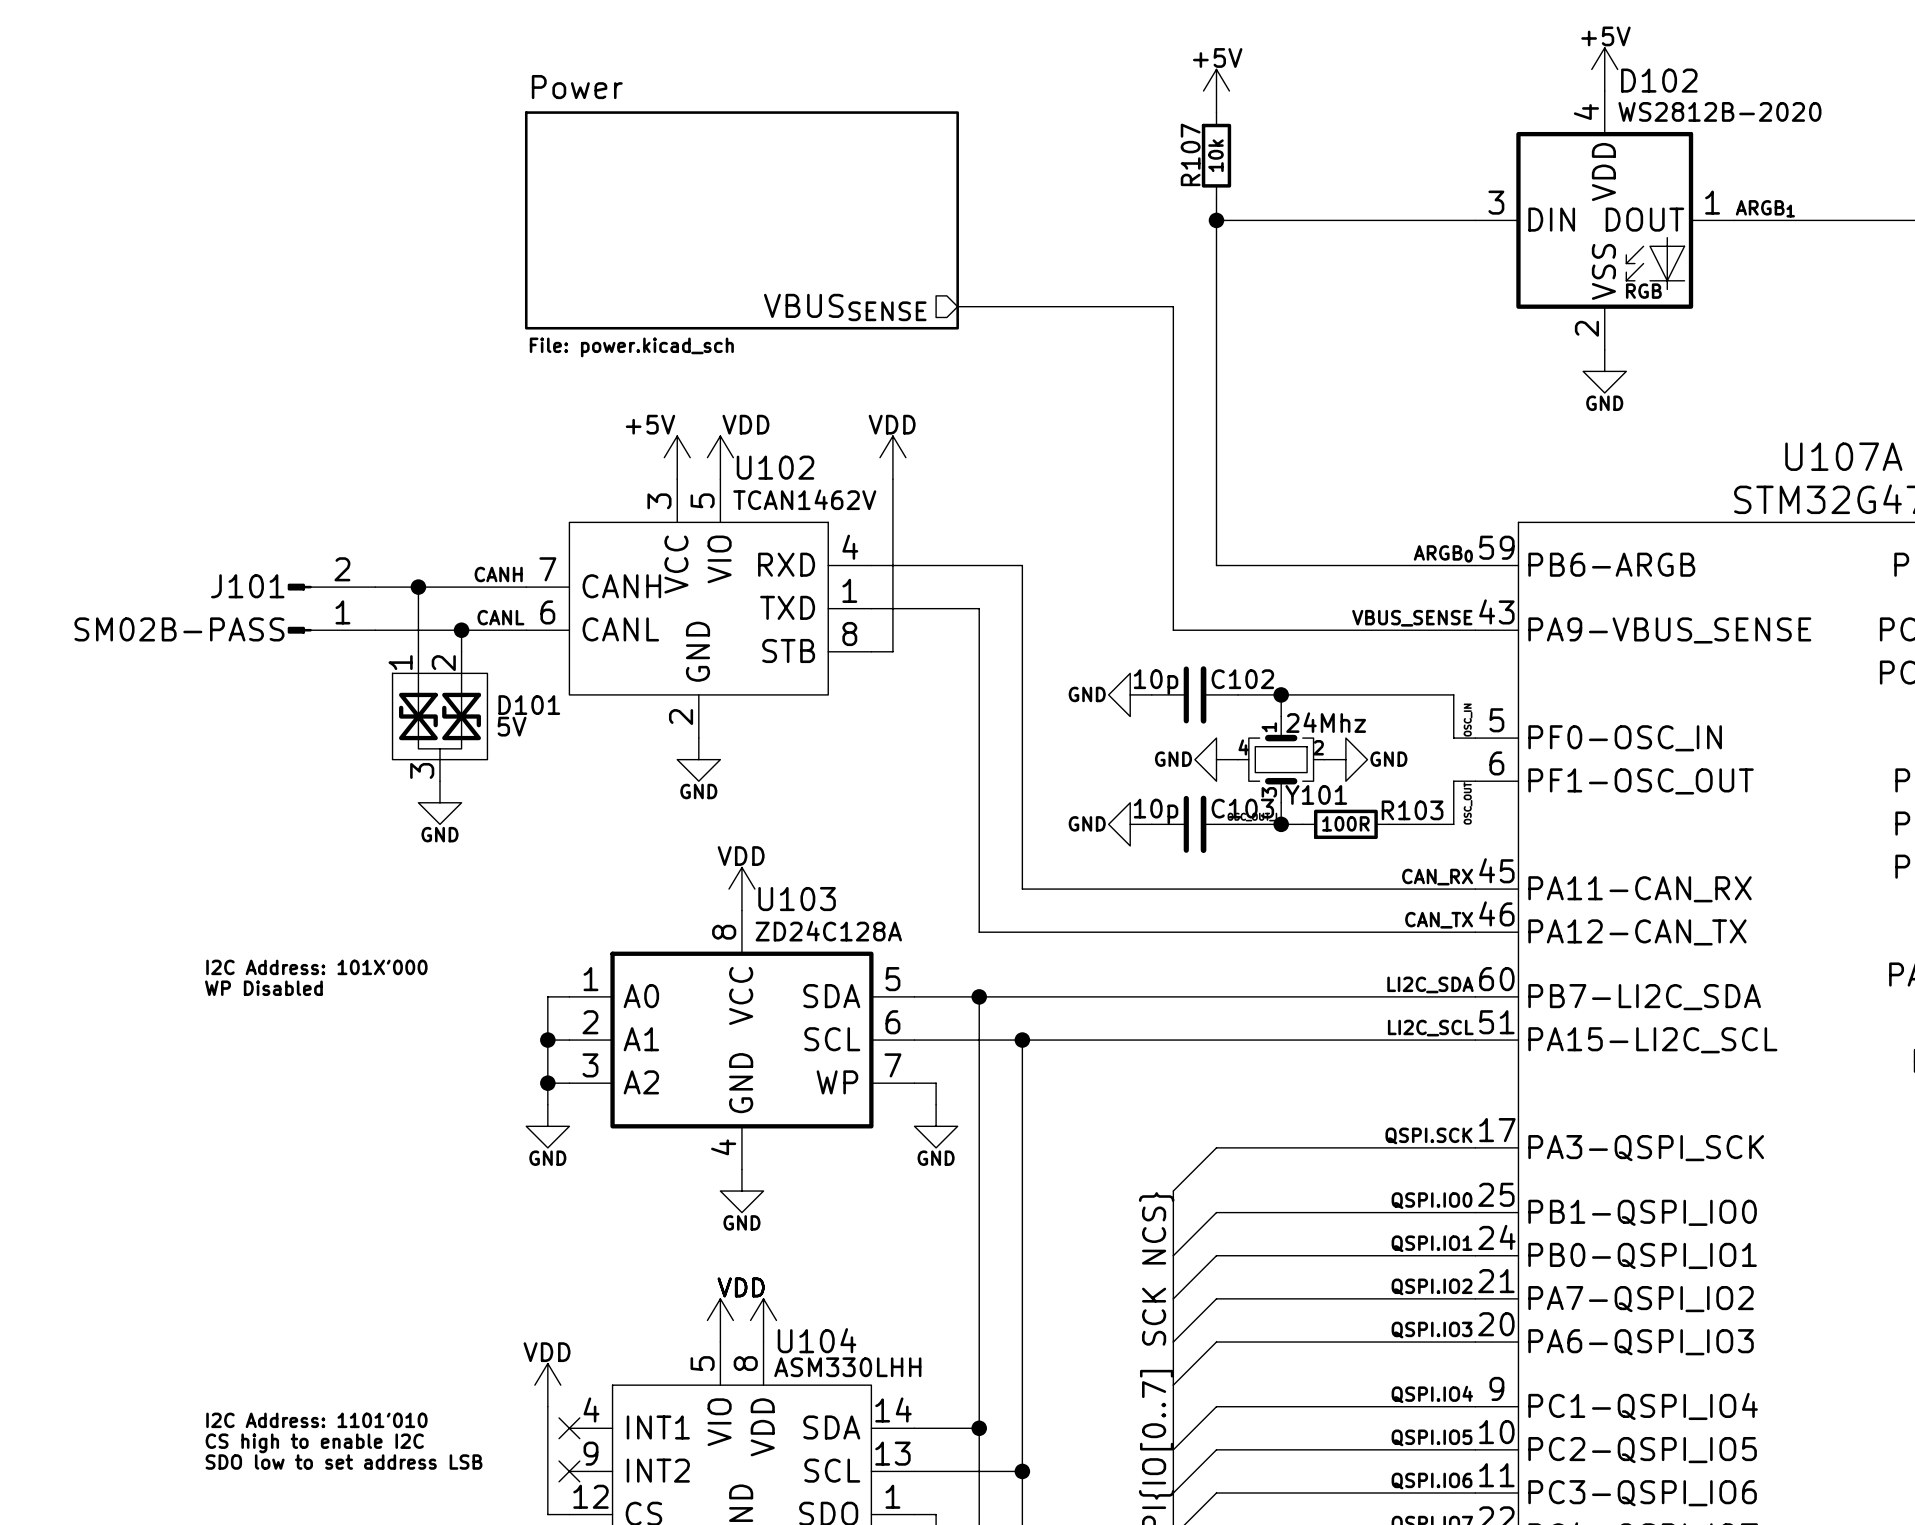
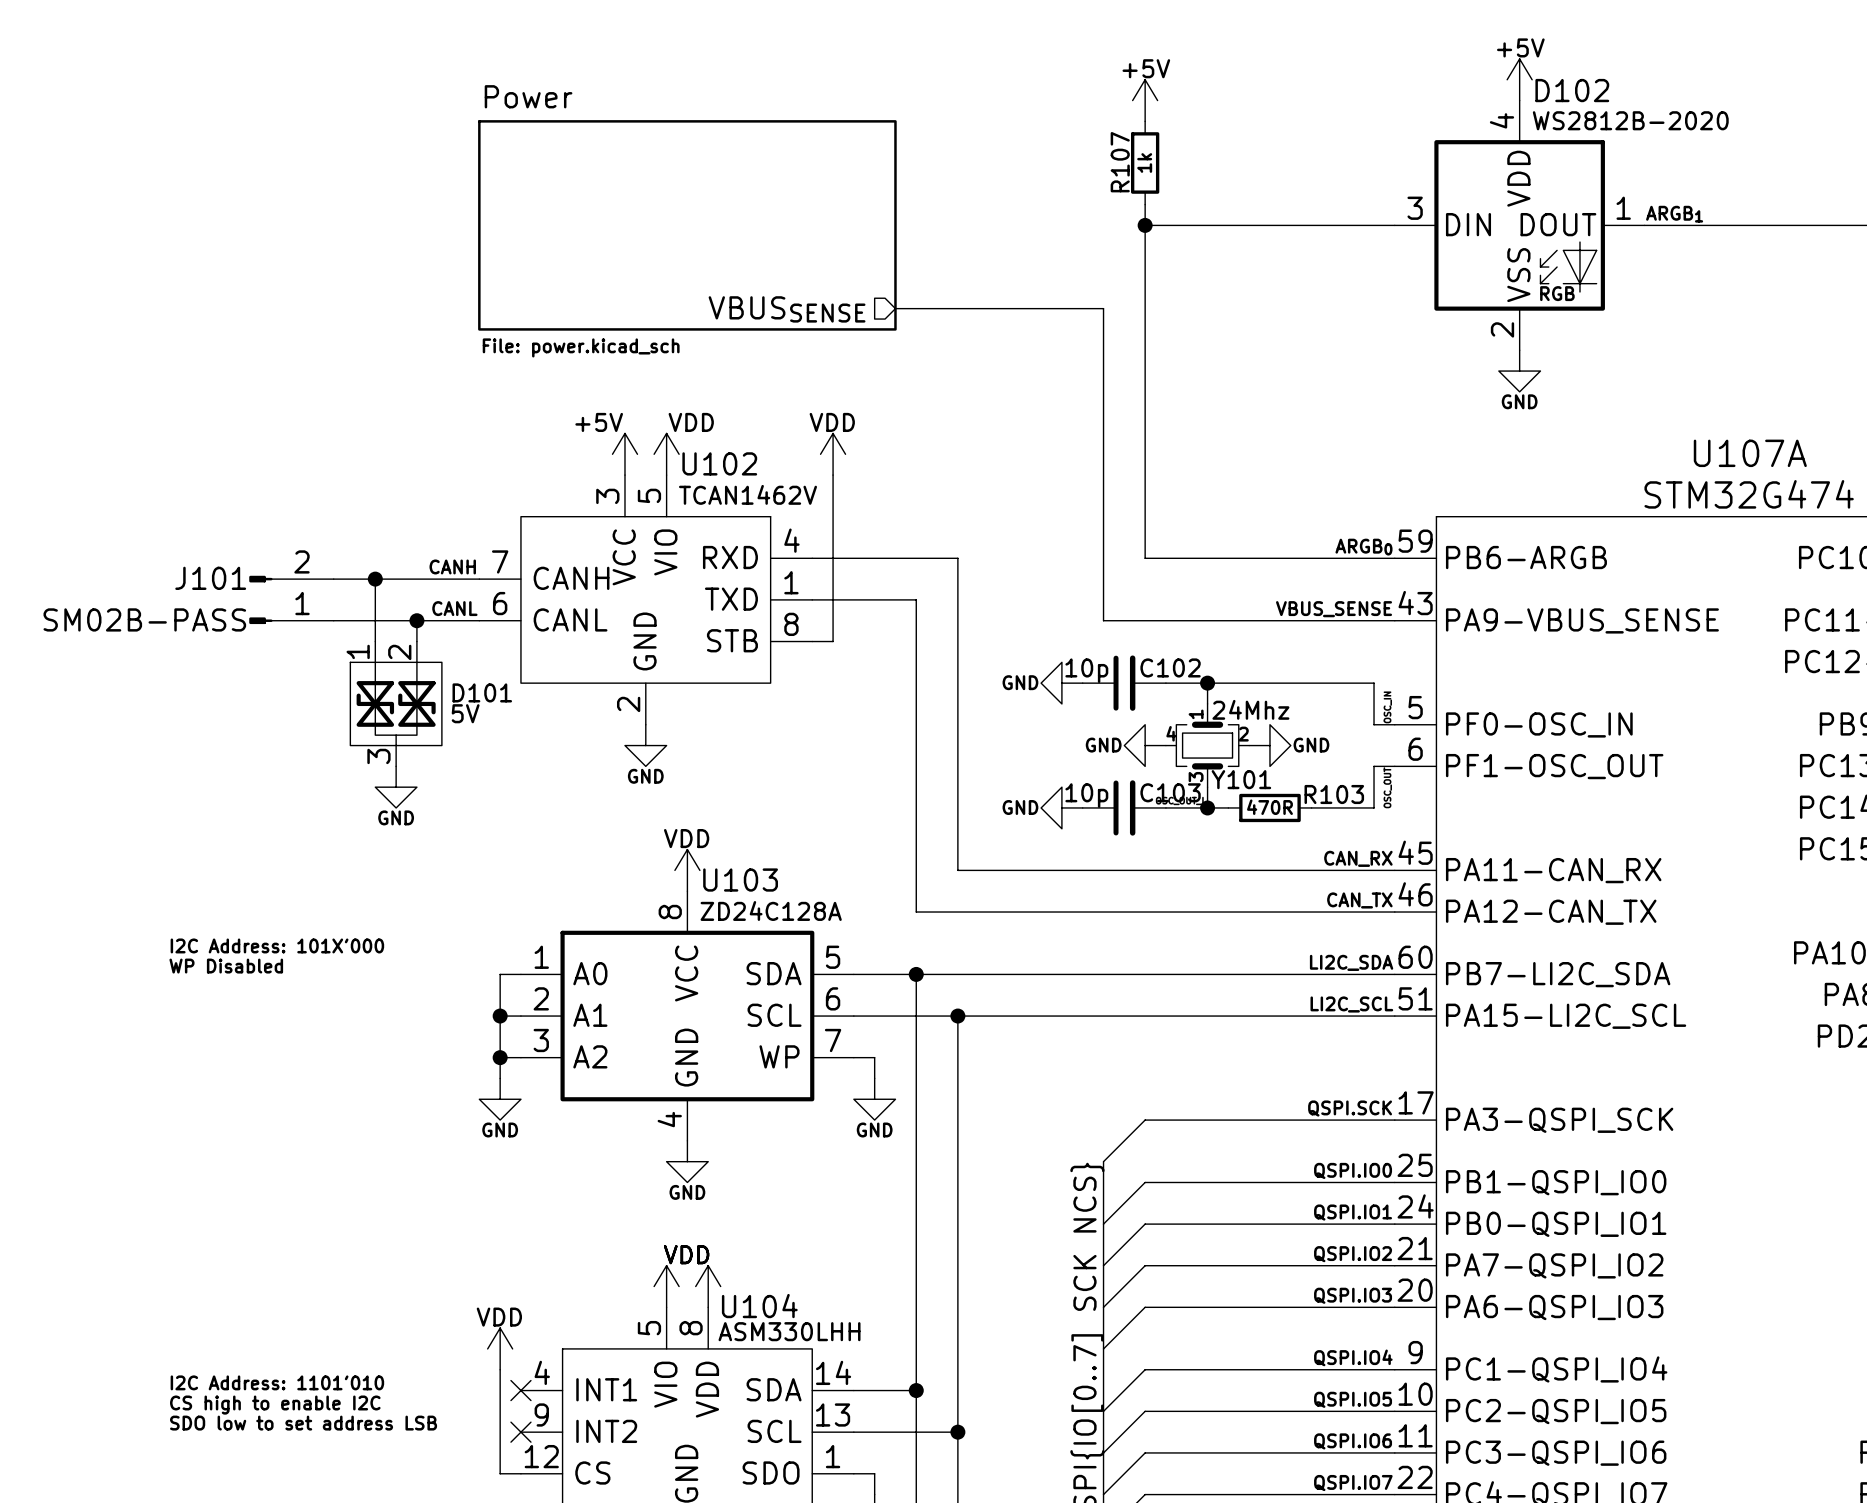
R107 value: 10k (1216, 155) -> 1k (1144, 162)
R103 value: 100R (1345, 823) -> 470R (1269, 807)

